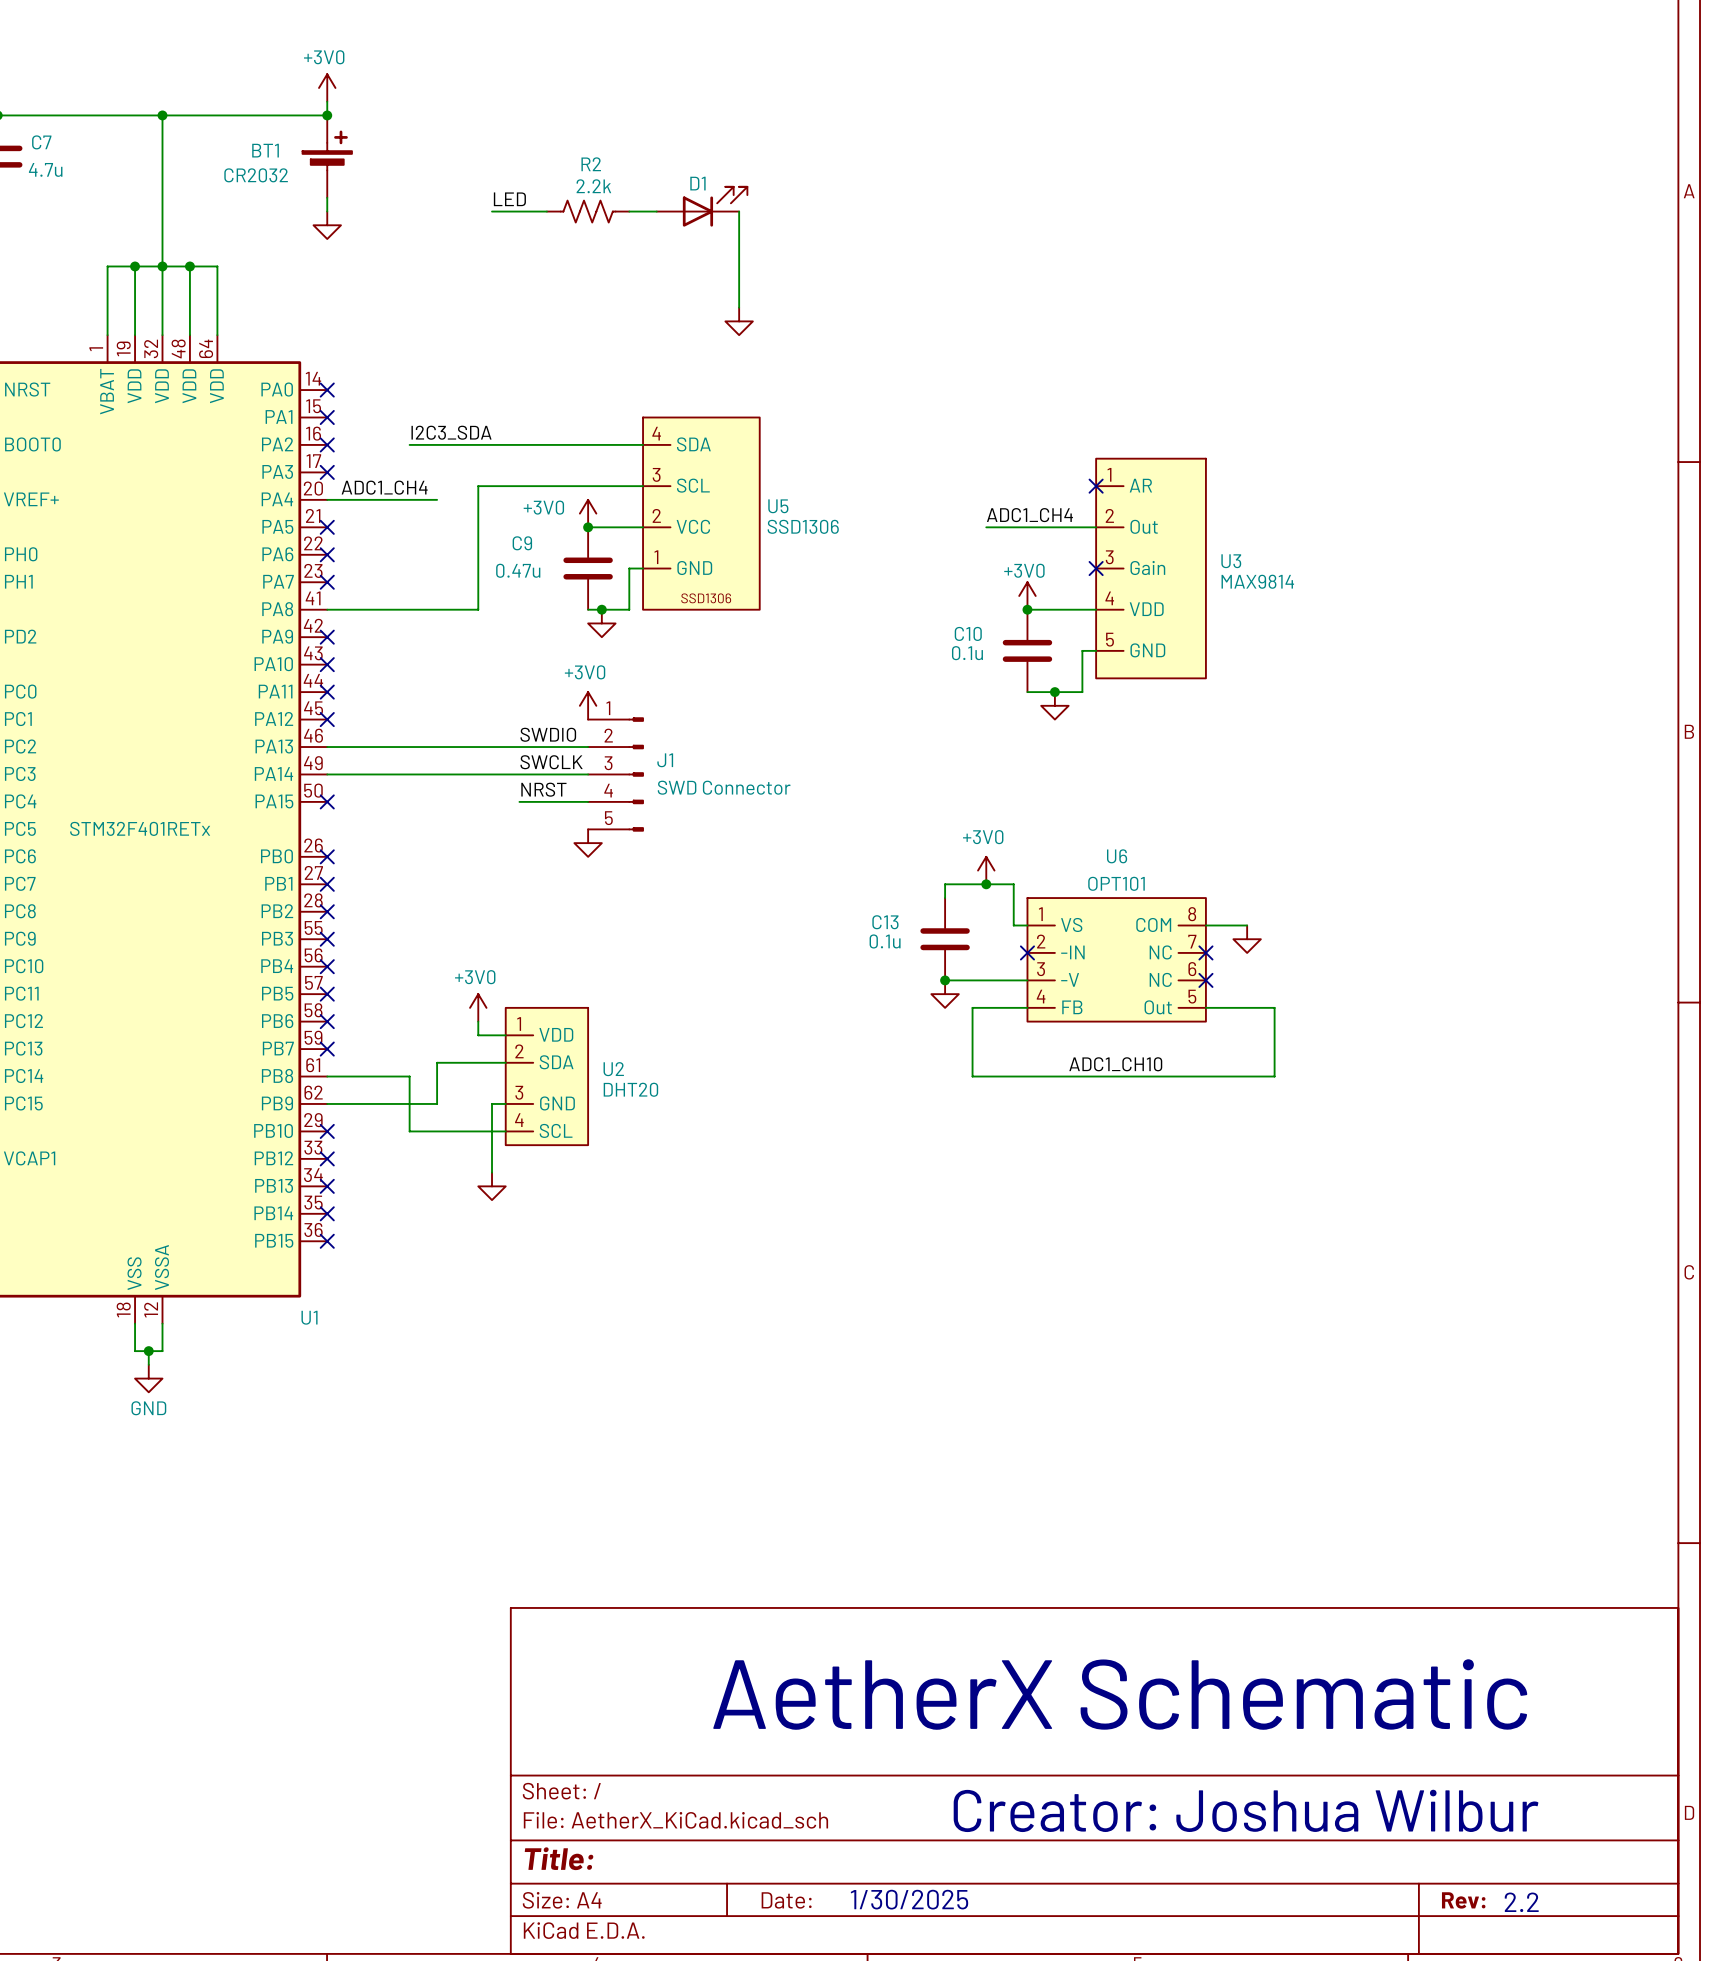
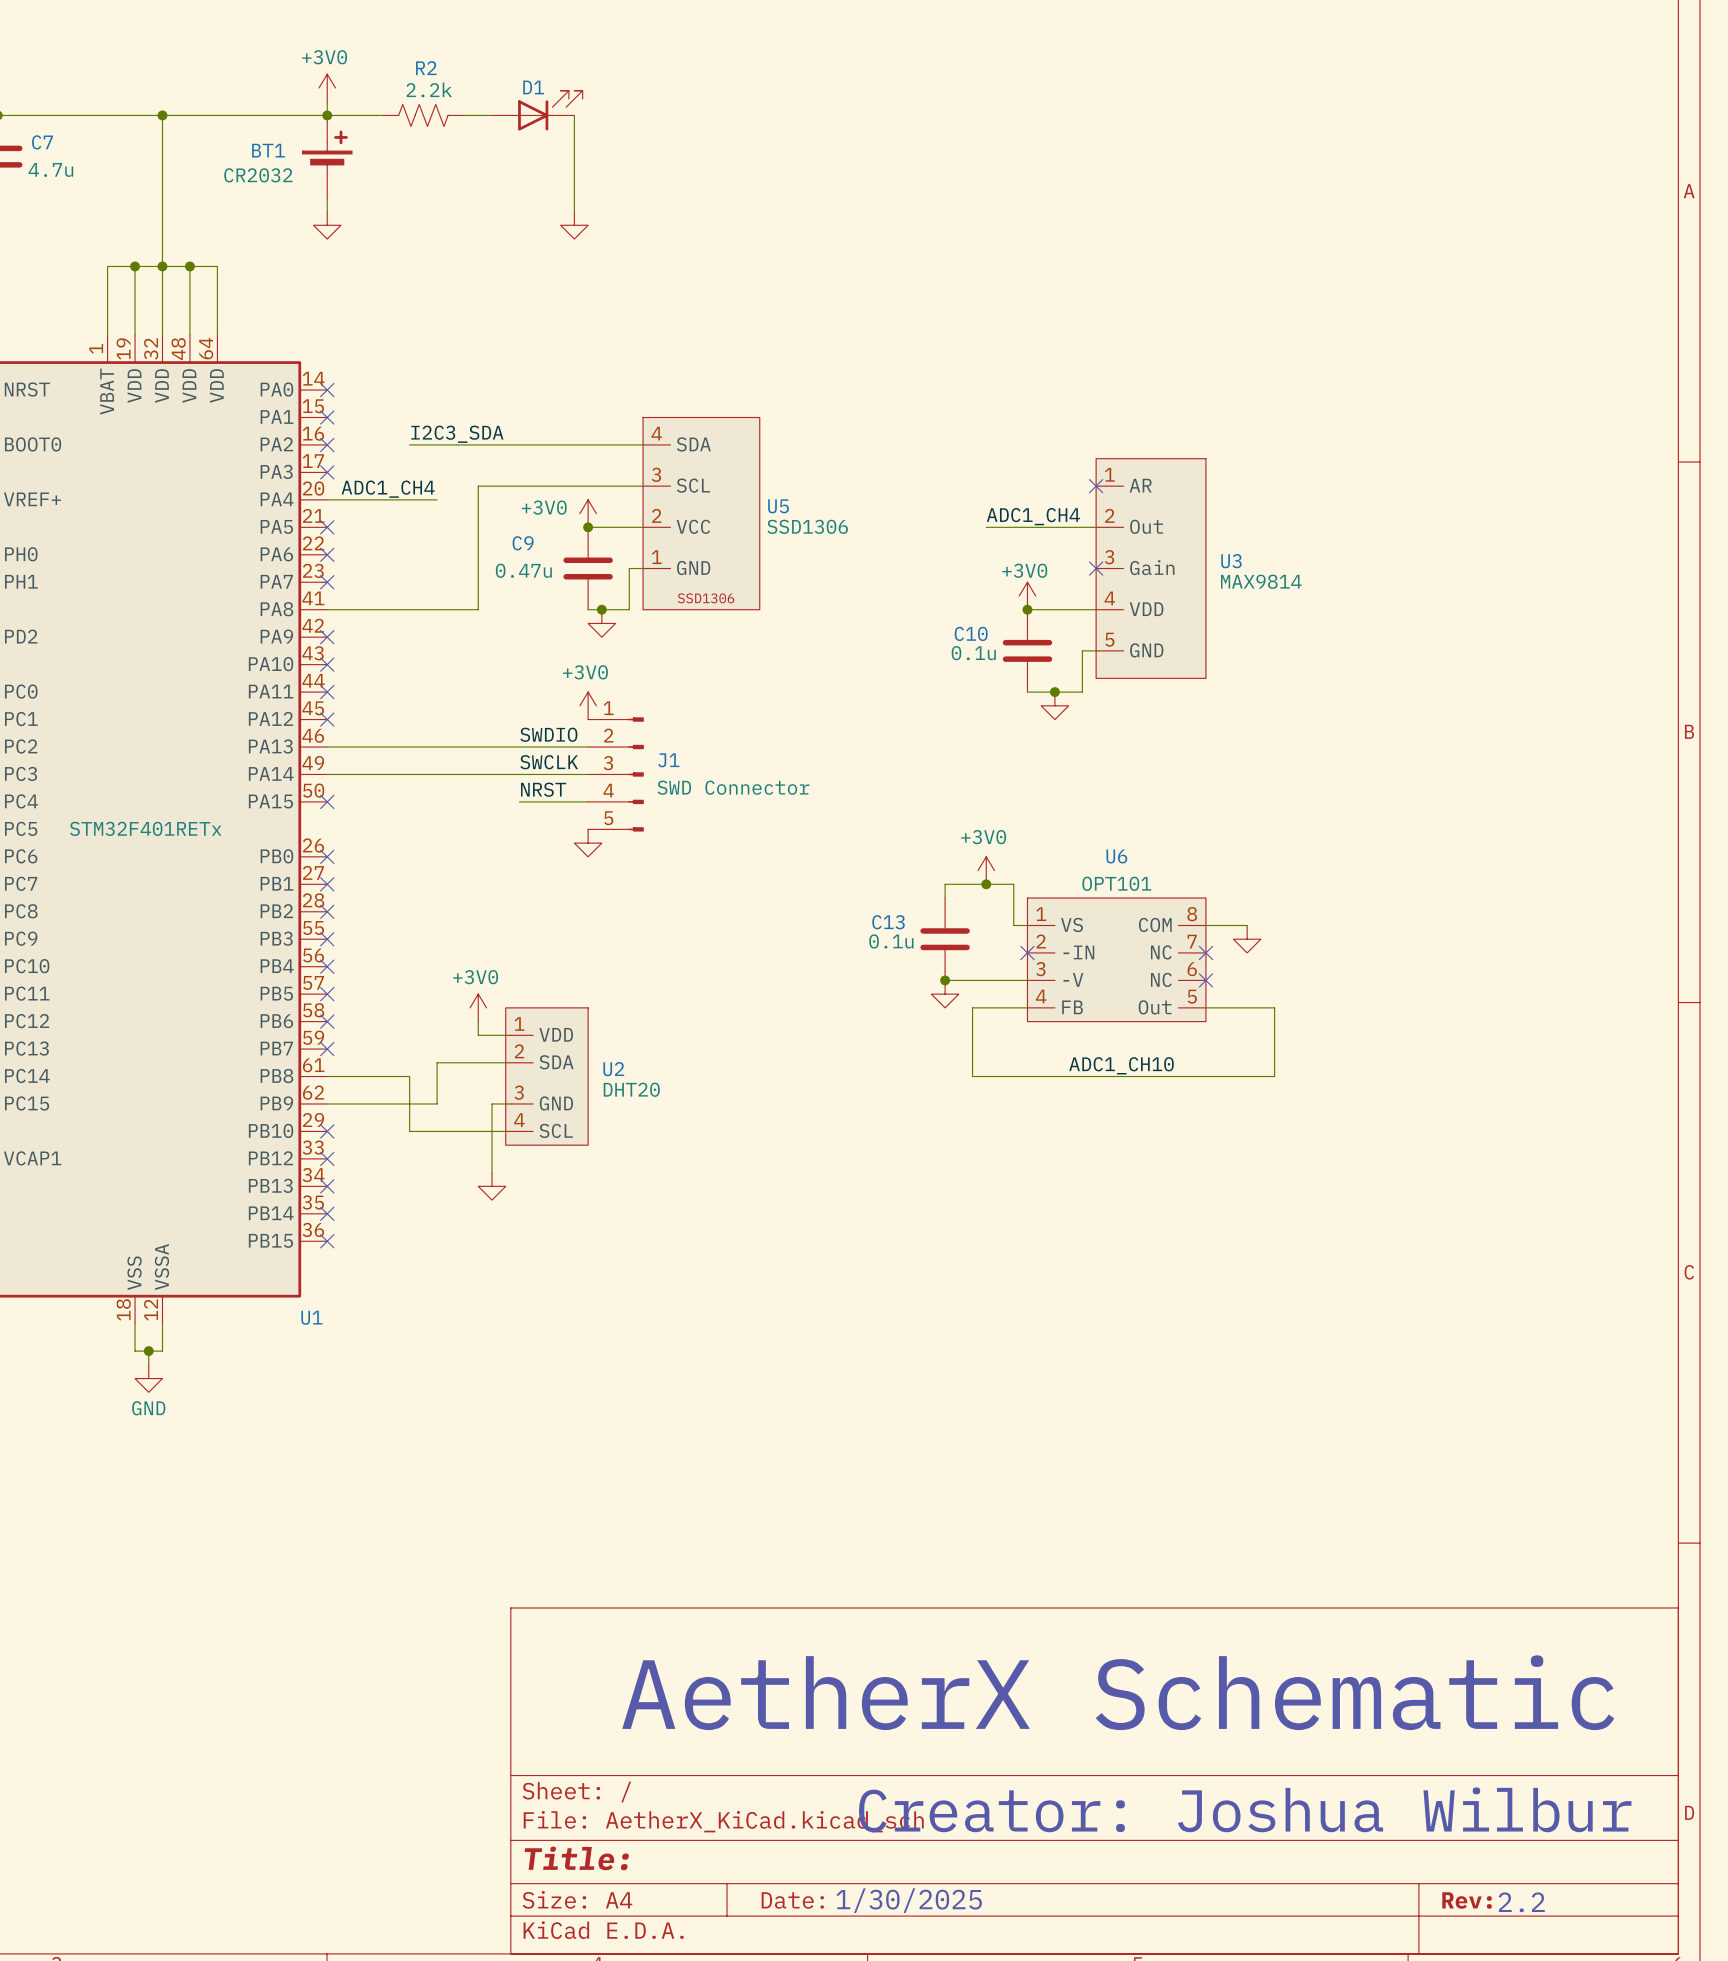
label: LED (509, 199) -> none
D1 position: (702, 206) -> (537, 110)
wire: (492, 211) (546, 211) -> (327, 115) (382, 115)
R2 position: (588, 211) -> (423, 115)
wire: (629, 211) (656, 211) -> (464, 115) (492, 115)
wire: (739, 211) (739, 307) -> (574, 115) (574, 211)
power symbol position: (739, 321) -> (574, 225)

